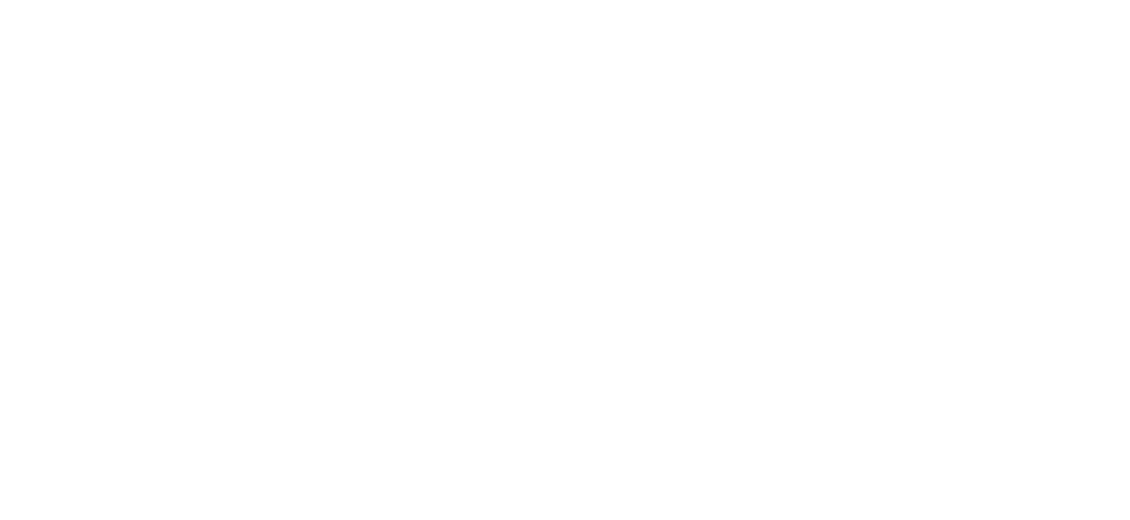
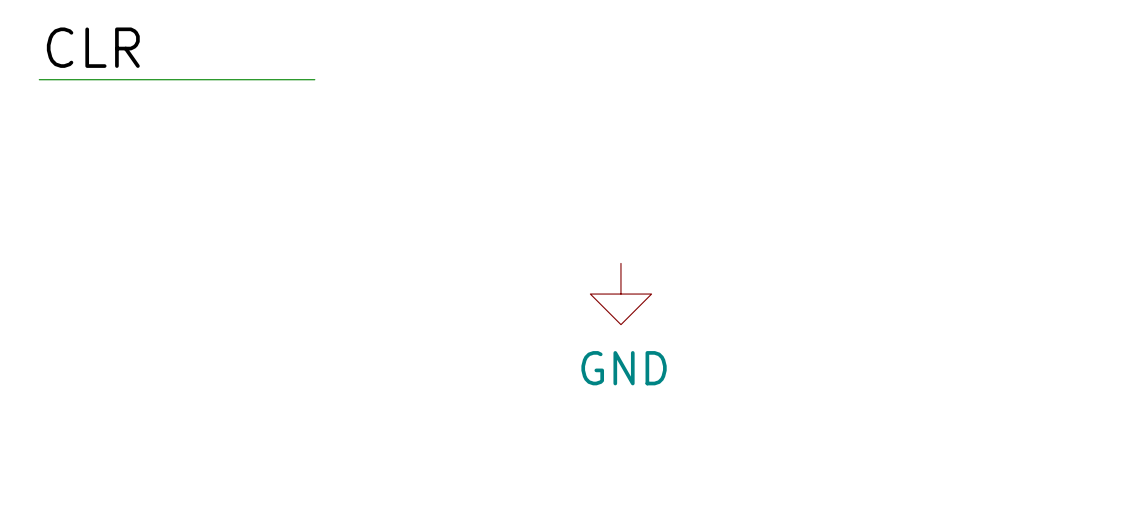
label: none -> CLR (93, 47)
wire: none -> (39, 79) (314, 79)
power symbol: none -> GND (620, 294)

